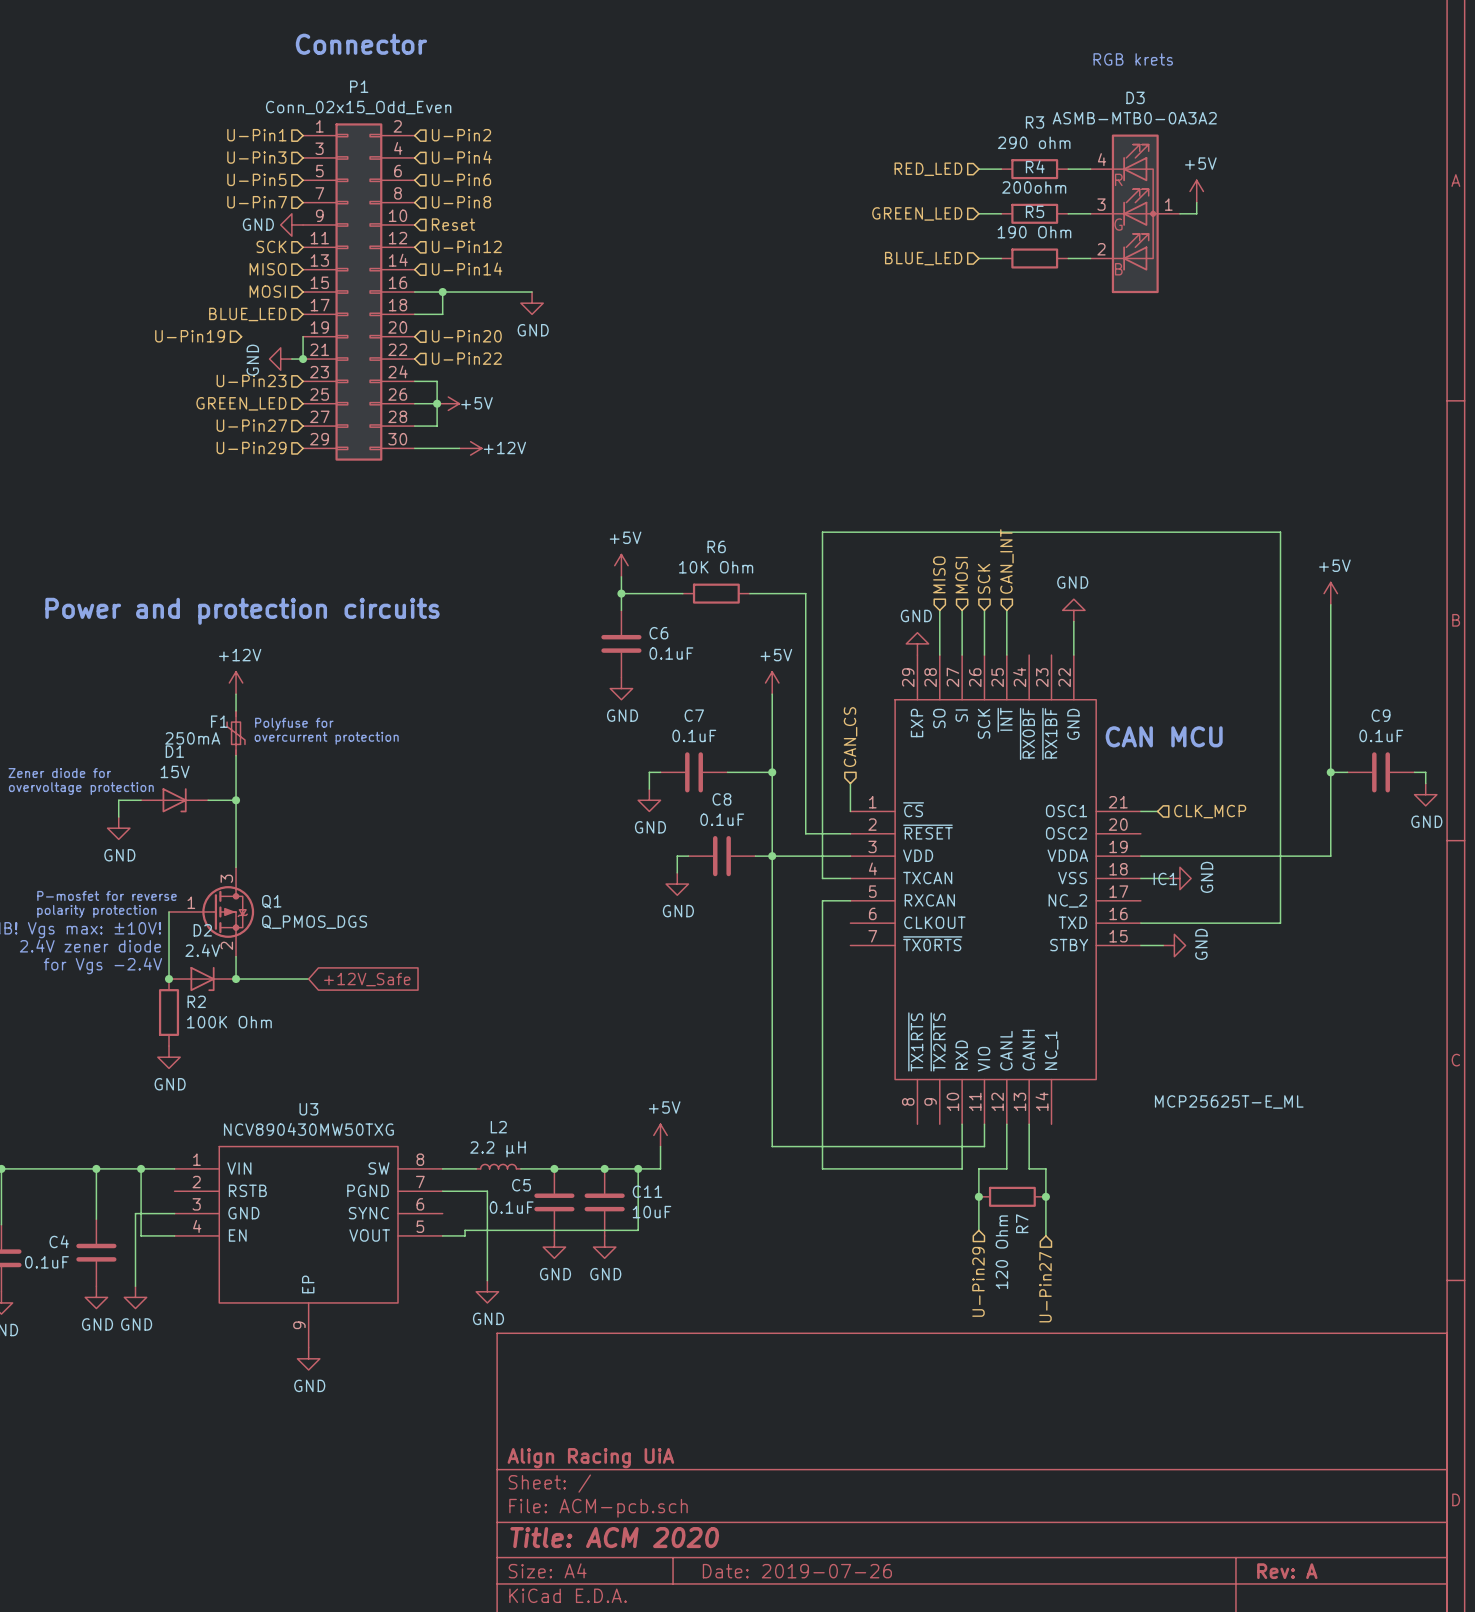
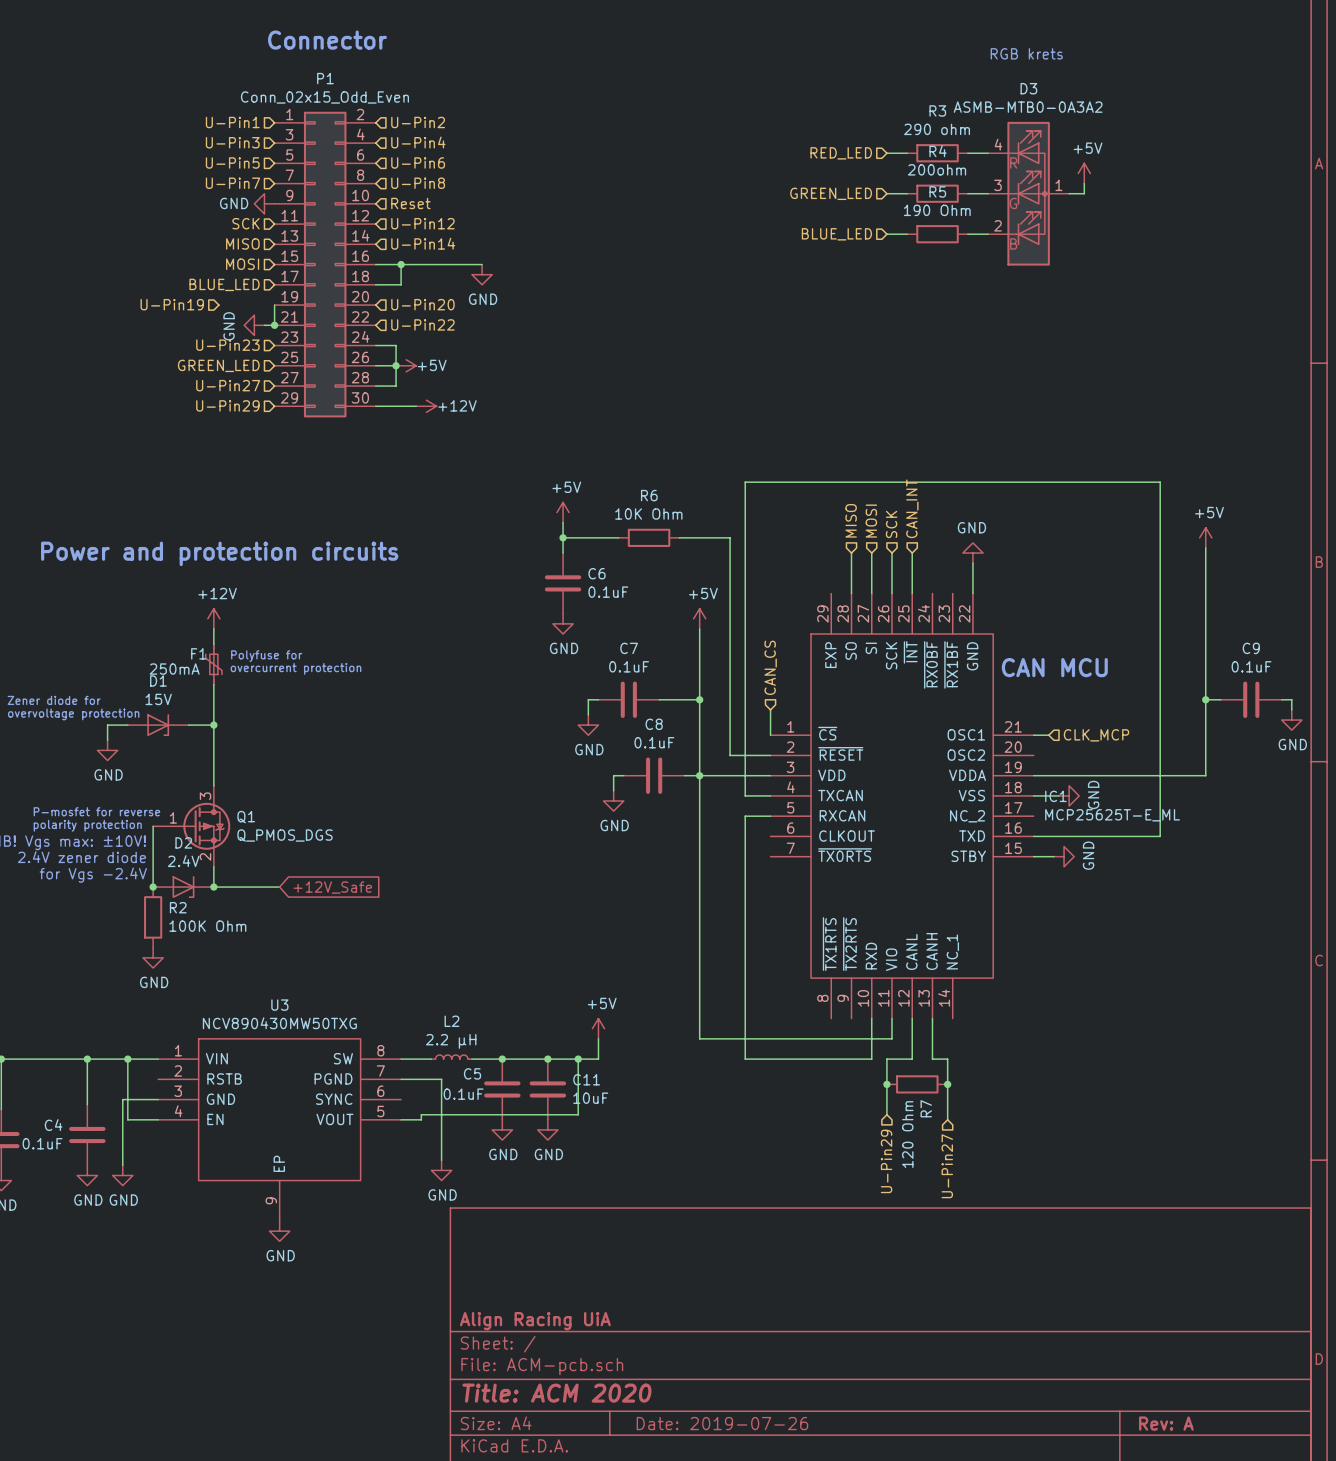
power symbol: GND (917, 643) -> none
IC1 value position: MCP25625T-E_ML (1229, 1102) -> MCP25625T-E_ML (1112, 815)

